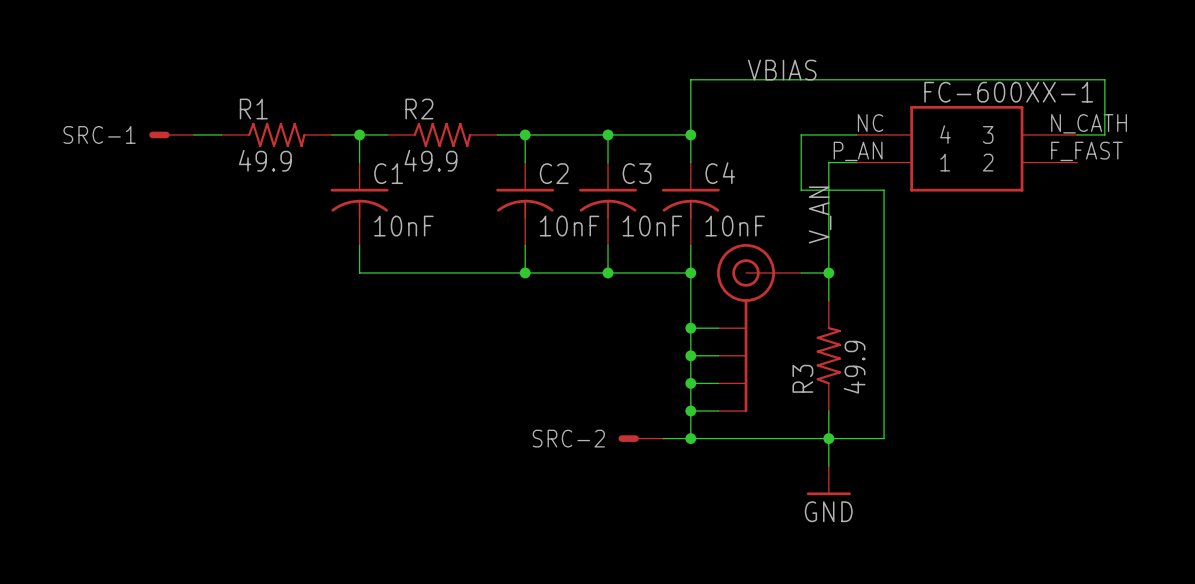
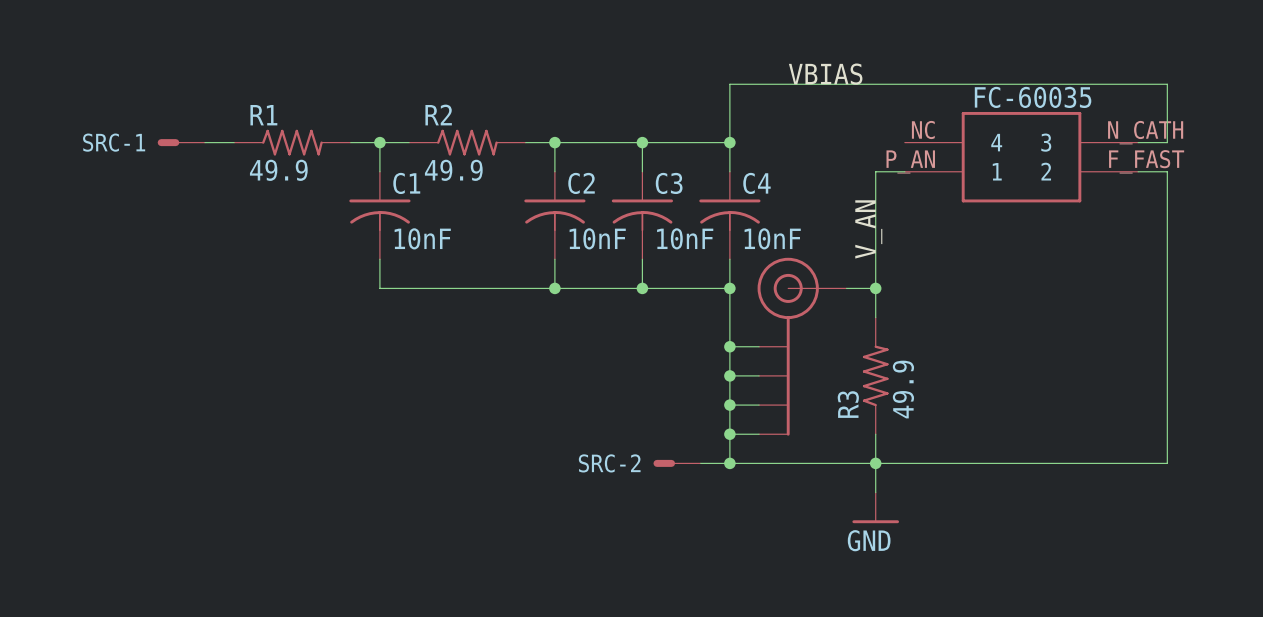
FC-600XX-1 name: FC-600XX-1 (1008, 92) -> FC-60035 (1033, 97)
wire: (856, 134) (801, 134) (801, 190) (884, 190) (884, 438) -> (1138, 171) (1167, 171) (1167, 463) (934, 463)

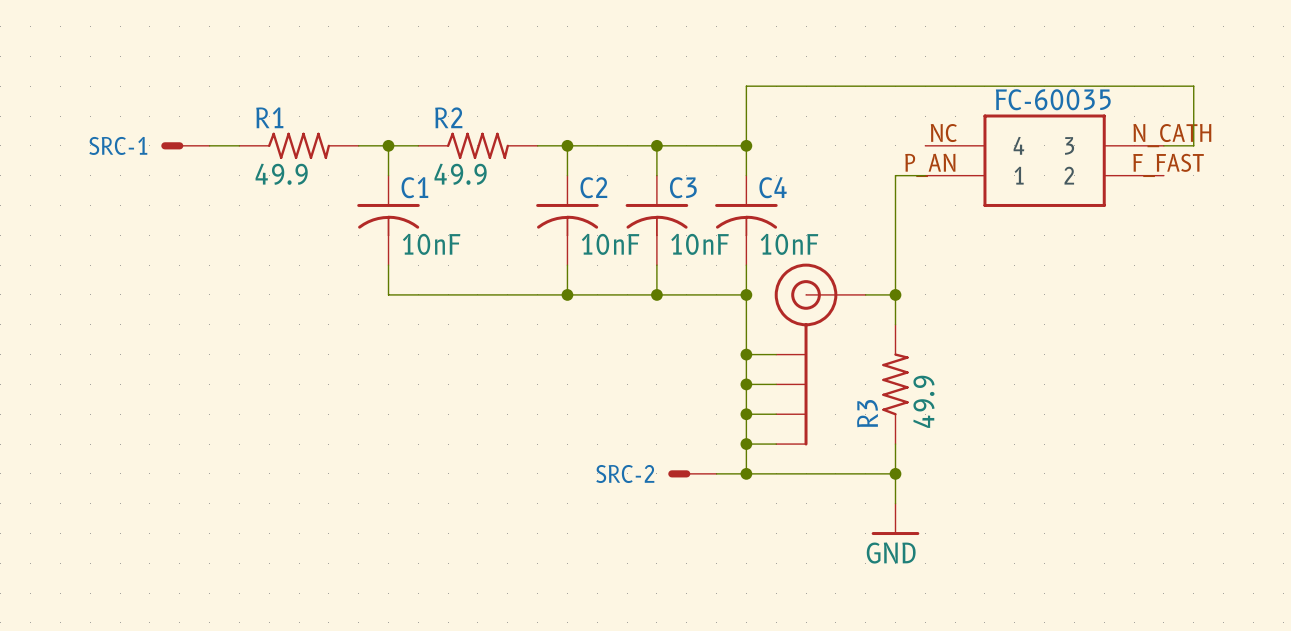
label: VBIAS (825, 74) -> none
wire: (1138, 171) (1167, 171) (1167, 463) (875, 463) -> none
label: V_AN (868, 229) -> none

